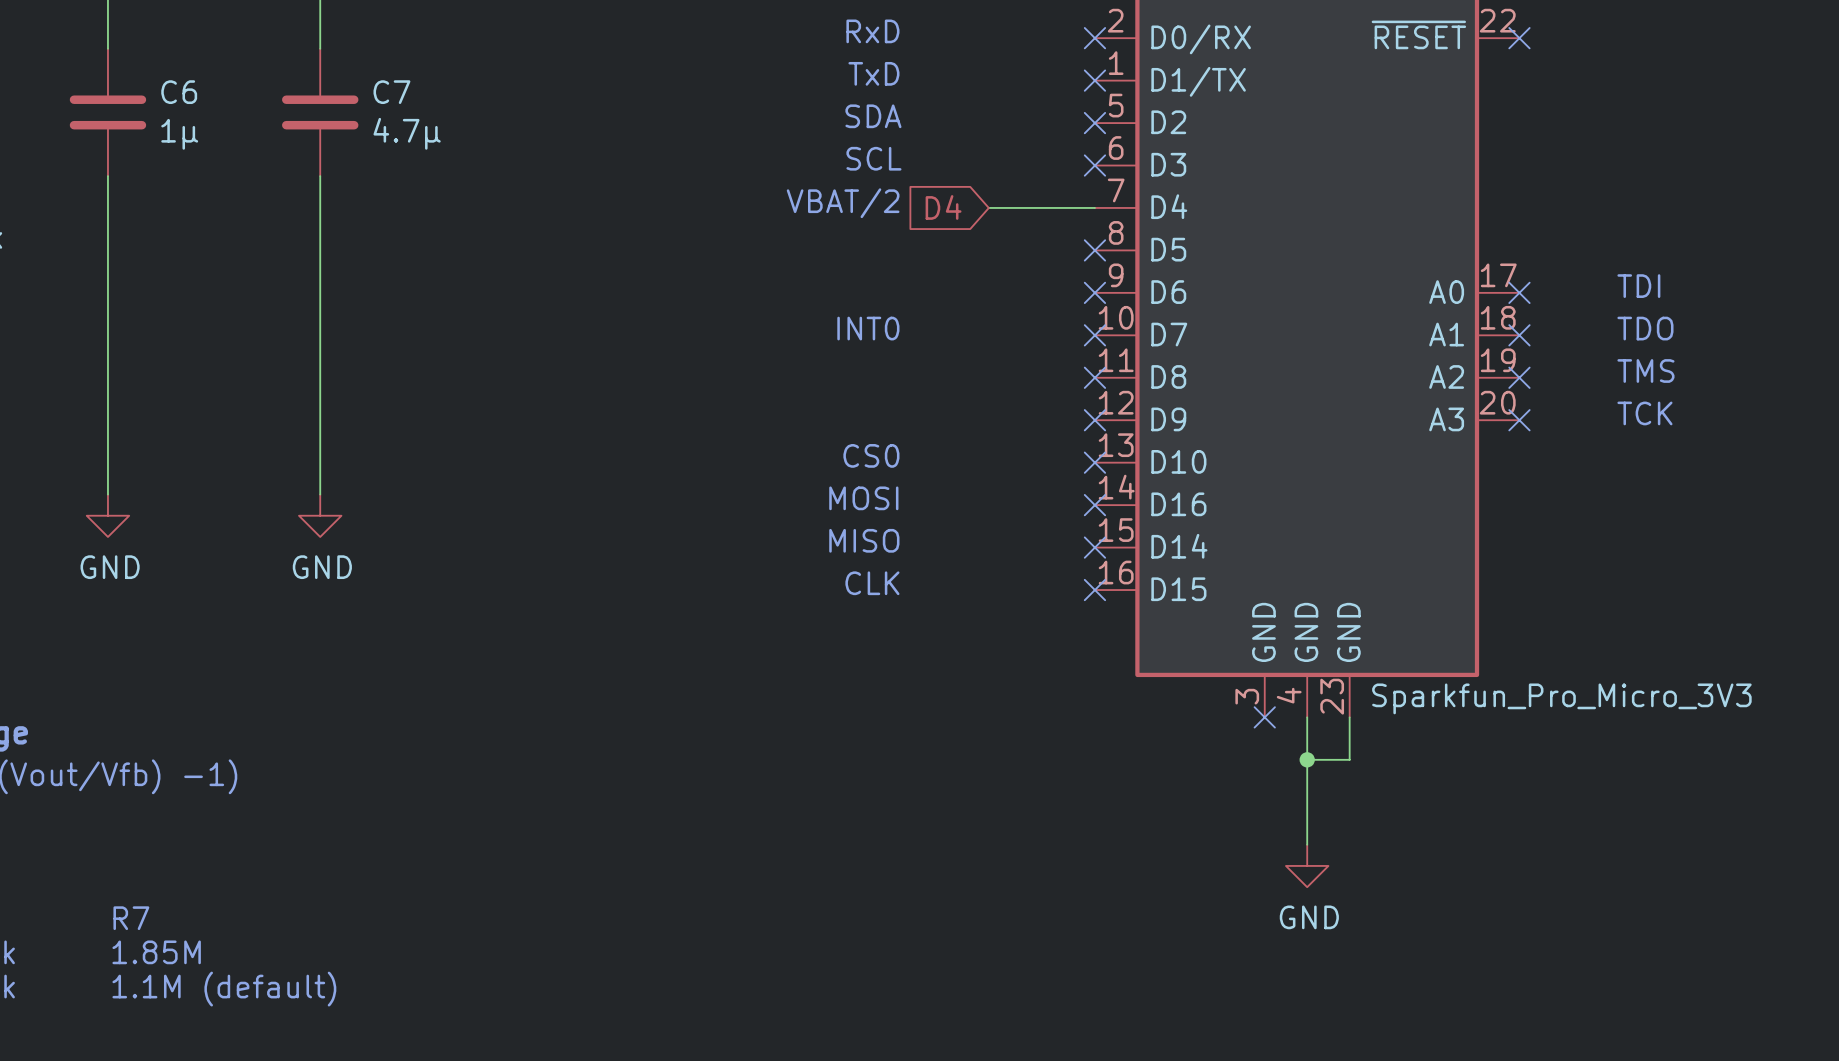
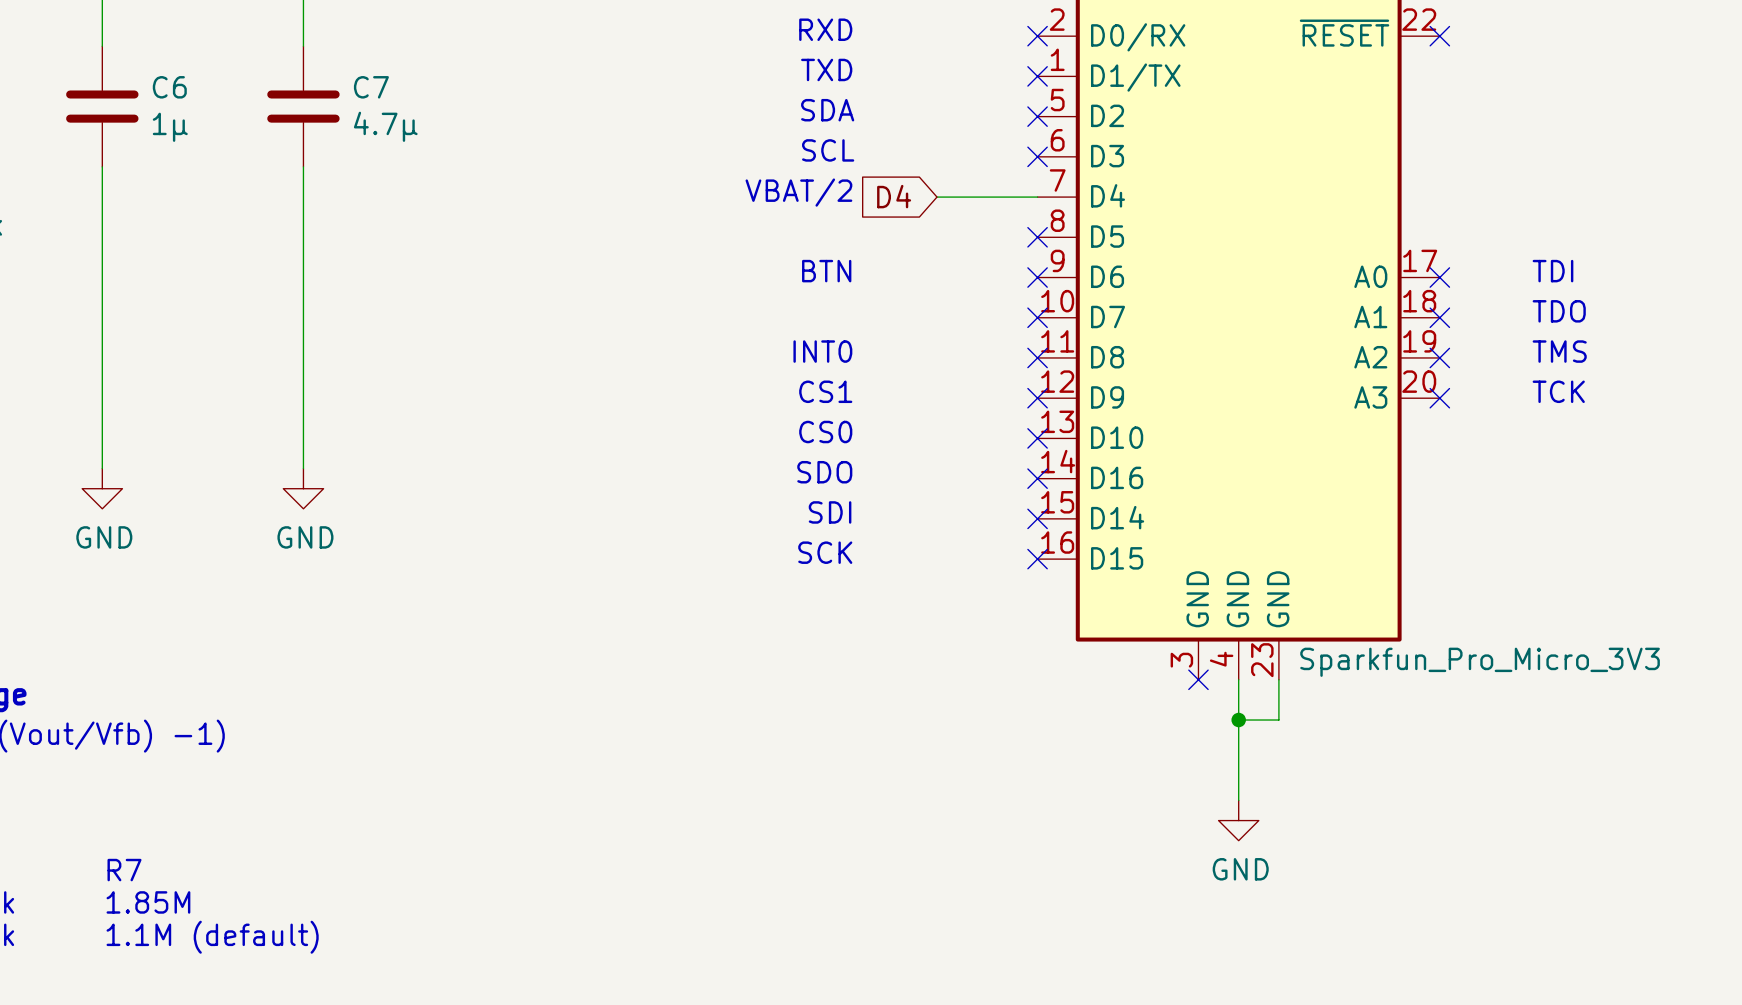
text: RxD (872, 31) -> RXD (825, 29)
text: TxD (873, 73) -> TXD (826, 69)
text: none -> BTN (826, 271)
text position: INT0 (868, 328) -> INT0 (822, 351)
text: none -> CS1 (825, 391)
text: MOSI (863, 498) -> SDO (824, 472)
text: MISO (864, 540) -> SDI (830, 512)
text: CLK (872, 583) -> SCK (825, 552)

